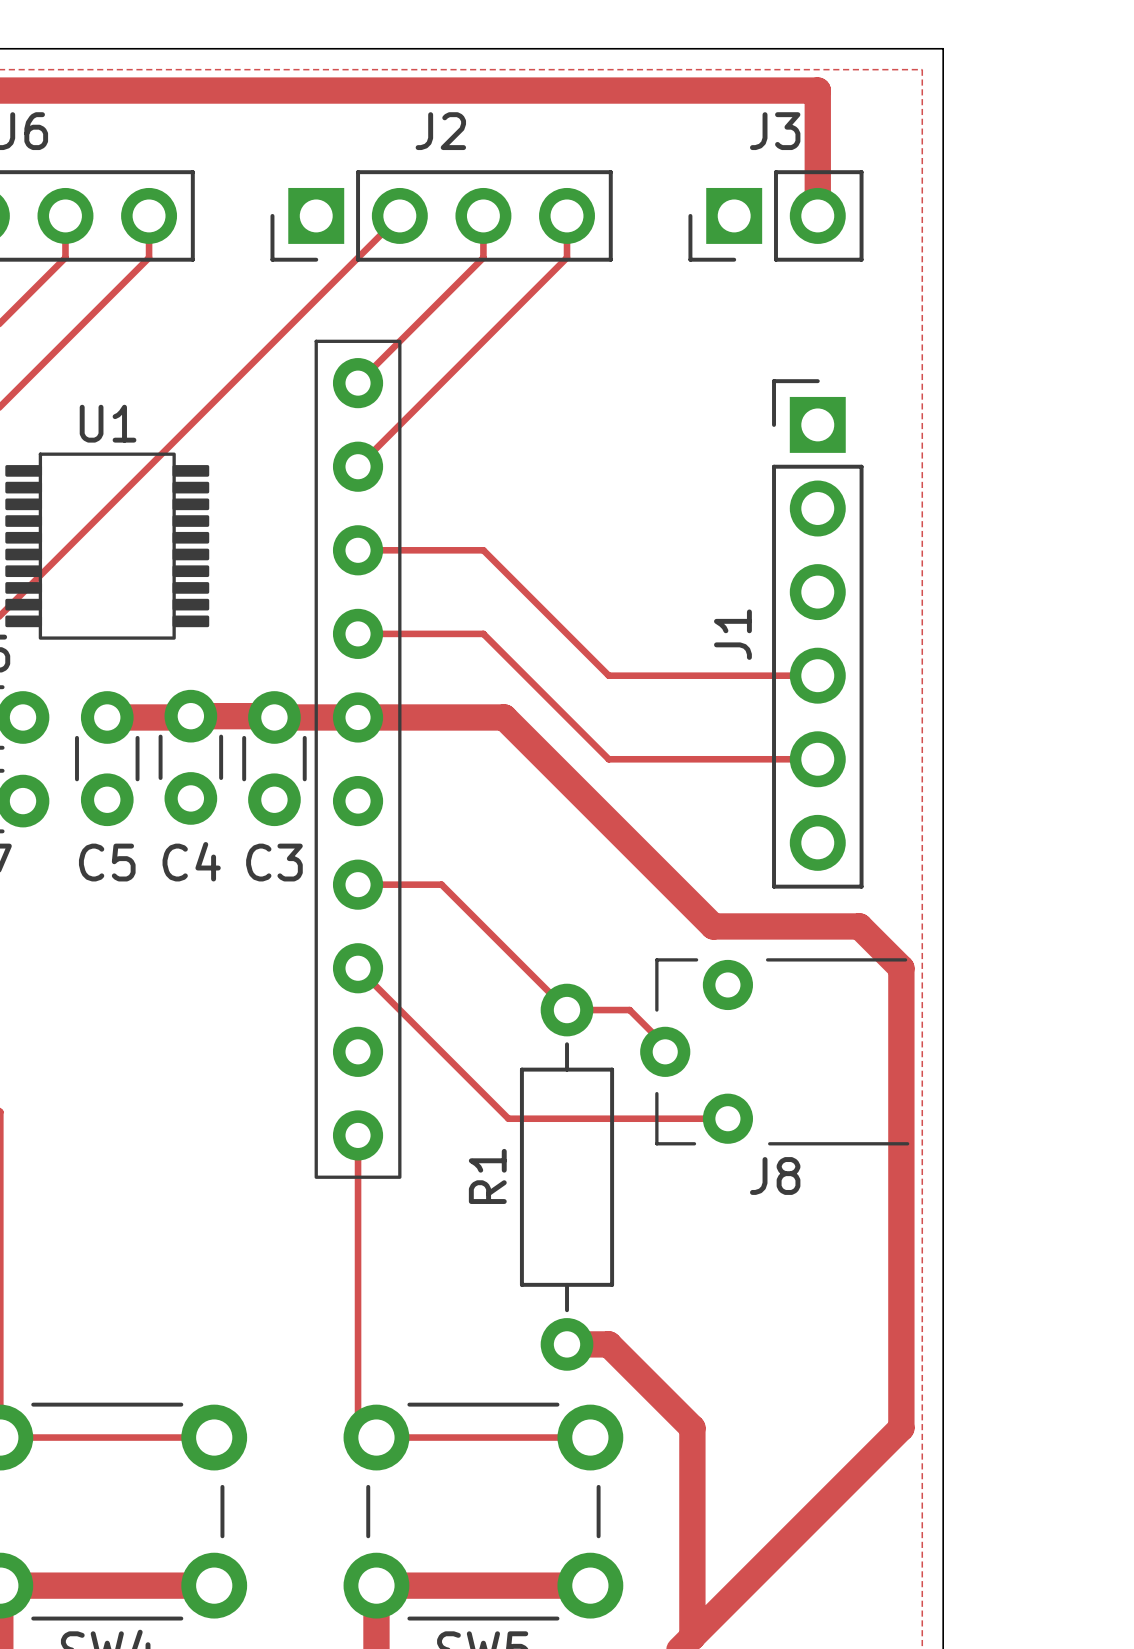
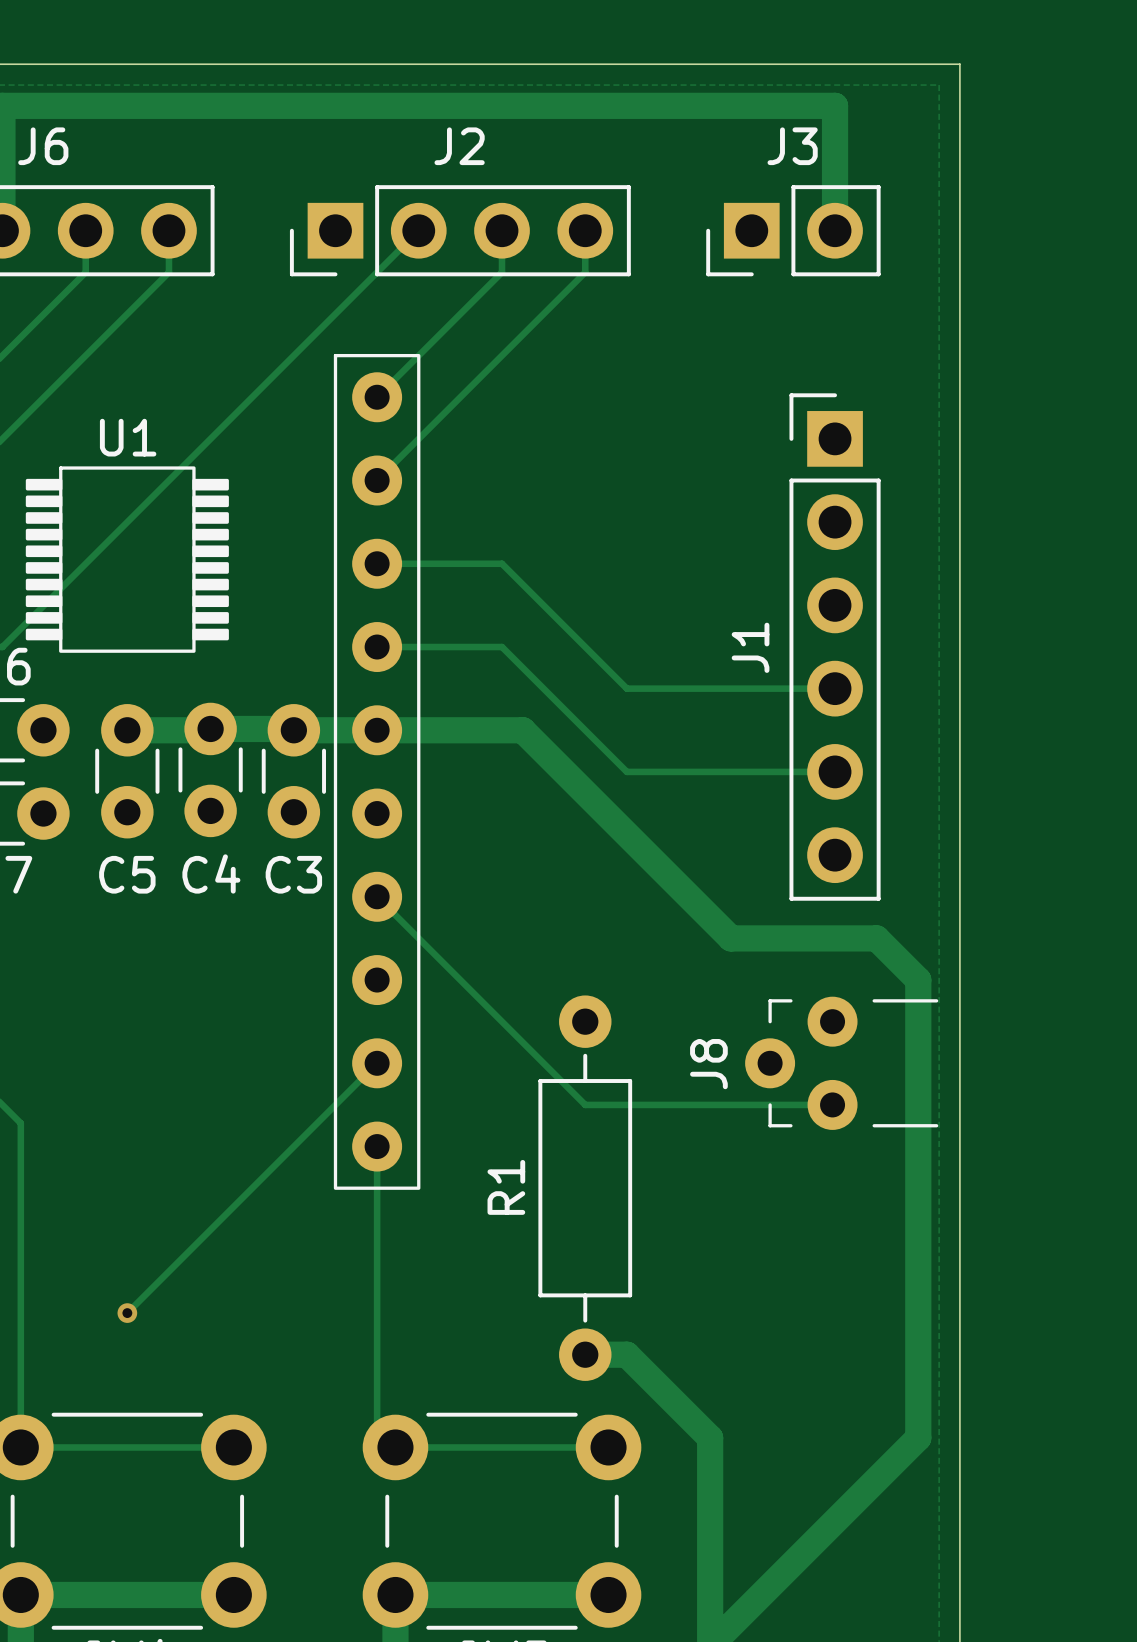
track: (358, 884) (441, 884) (567, 1010) (629, 1010) (665, 1045) (665, 1051) -> (377, 896) (585, 1104) (832, 1104)
J8 footprint: [640, 958, 910, 1146] -> [745, 996, 939, 1130]
track: (358, 968) (508, 1118) (727, 1118) -> none
track: none -> (377, 1063) (127, 1313)
J8 name position: J8 (775, 1176) -> J8 (708, 1064)
via: none -> (127, 1313)

